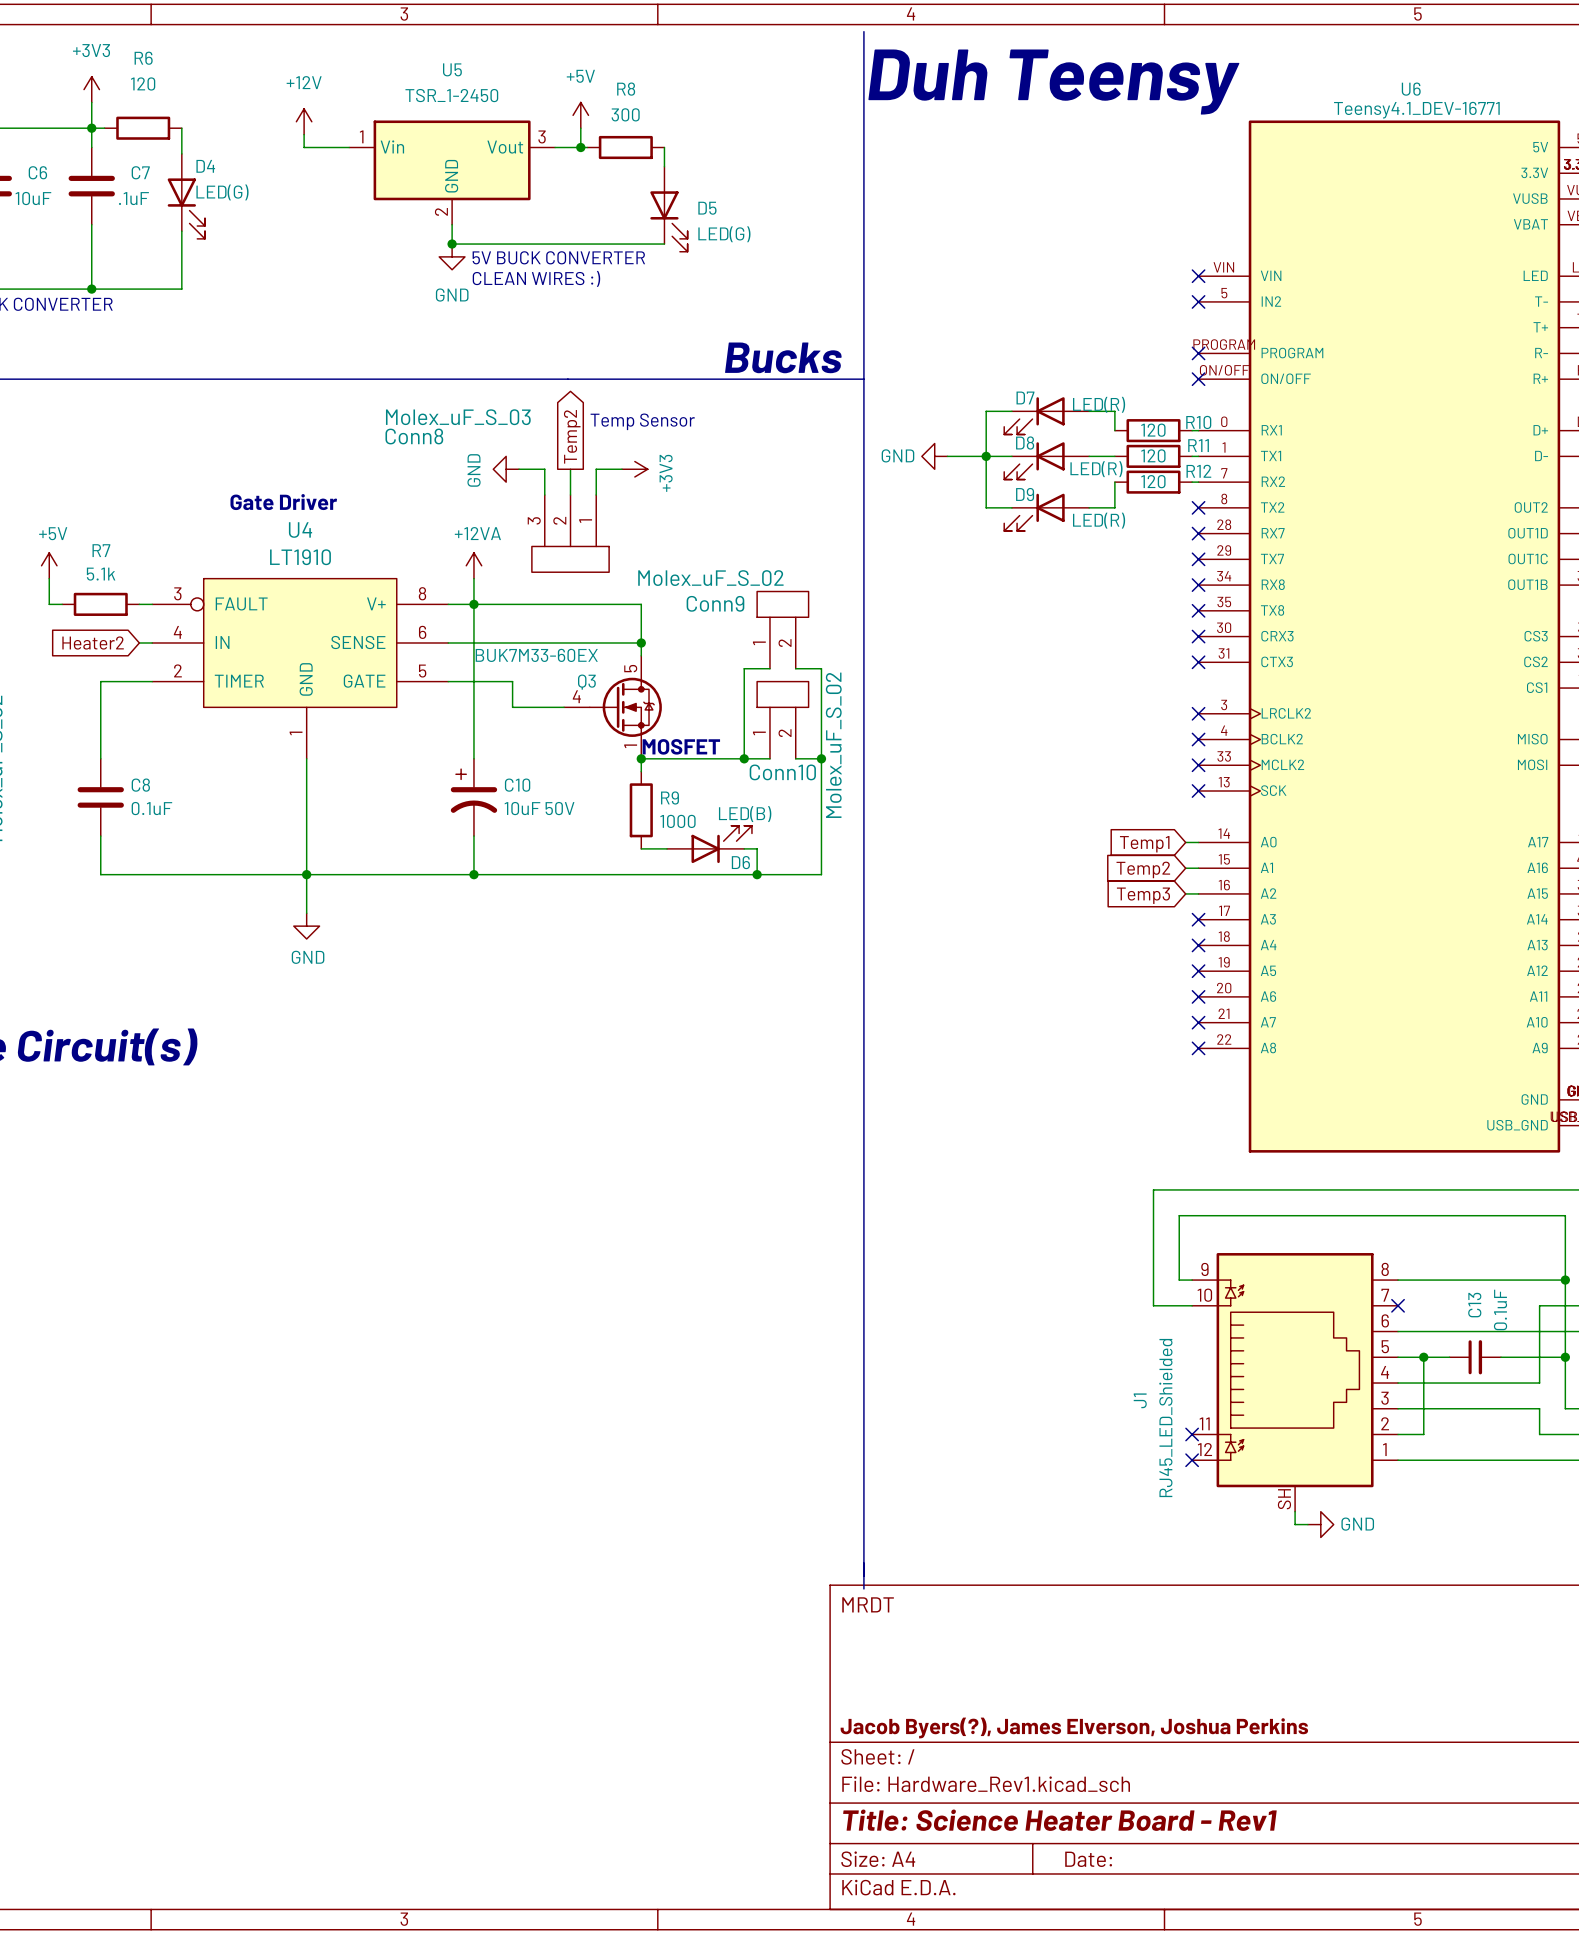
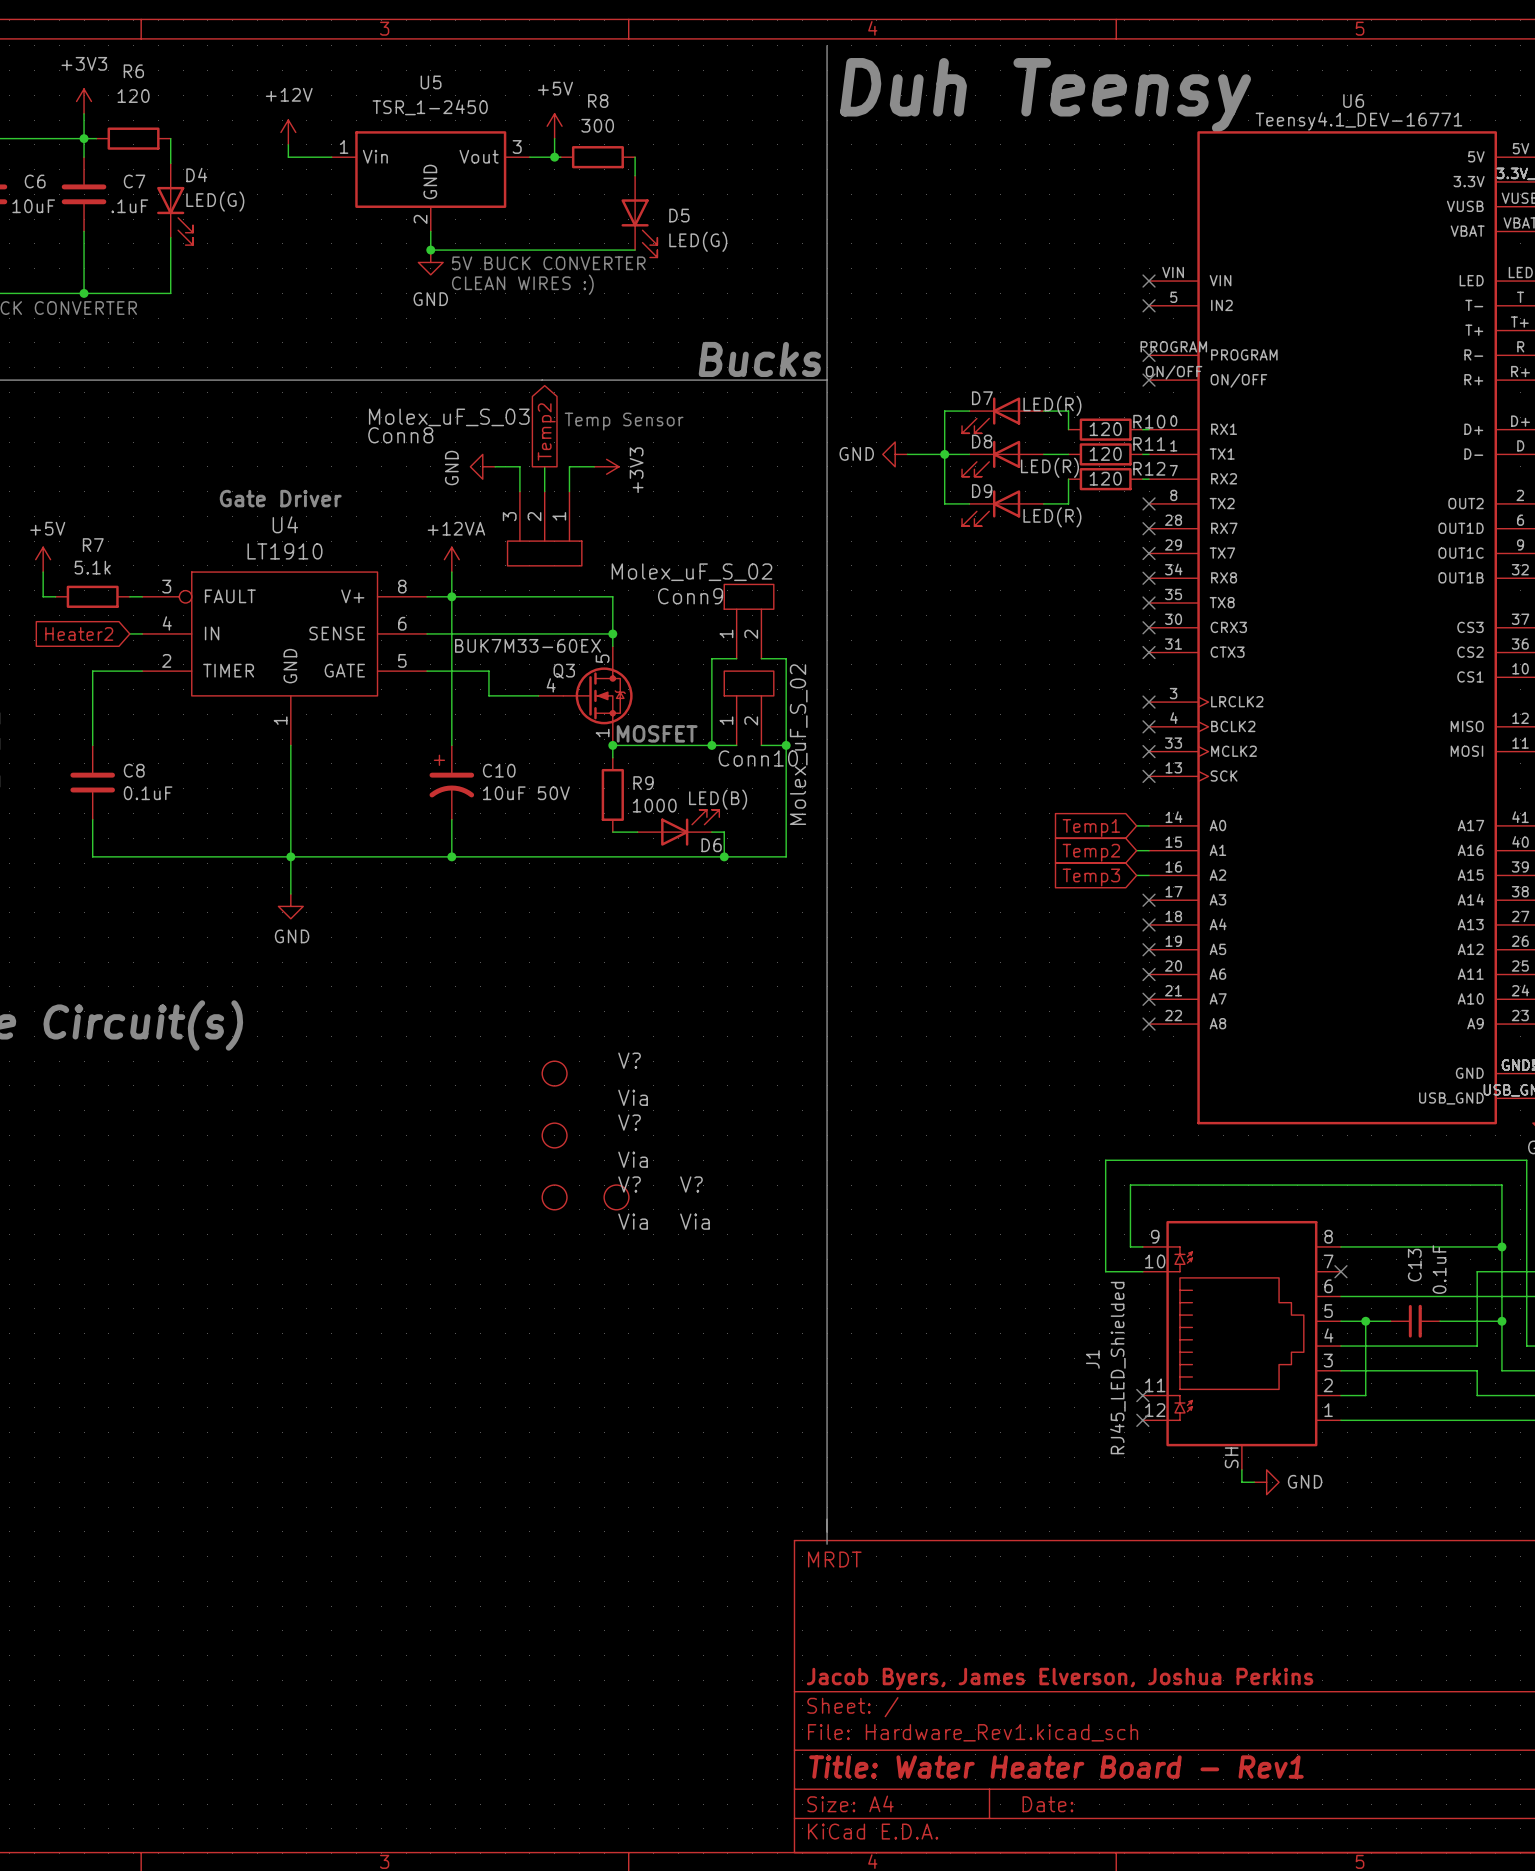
V?: none -> Via (554, 1073)
V?: none -> Via (554, 1135)
V?: none -> Via (554, 1197)
V?: none -> Via (616, 1197)
title block: Jacob Byers(?), James Elverson, Joshua Perkins (1074, 1728) -> Jacob Byers, James Elverson, Joshua Perkins (1060, 1678)
title block: Title: Science Heater Board - Rev1 (1059, 1820) -> Title: Water Heater Board - Rev1 (1056, 1767)

